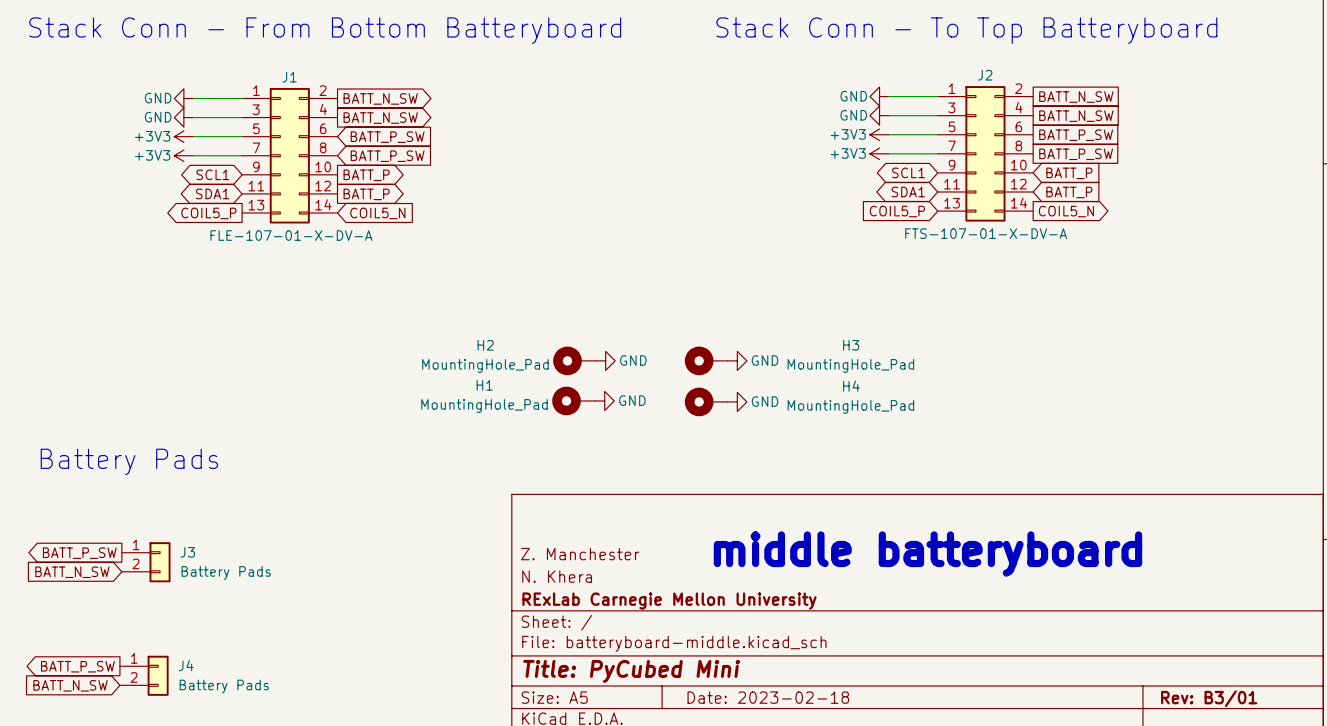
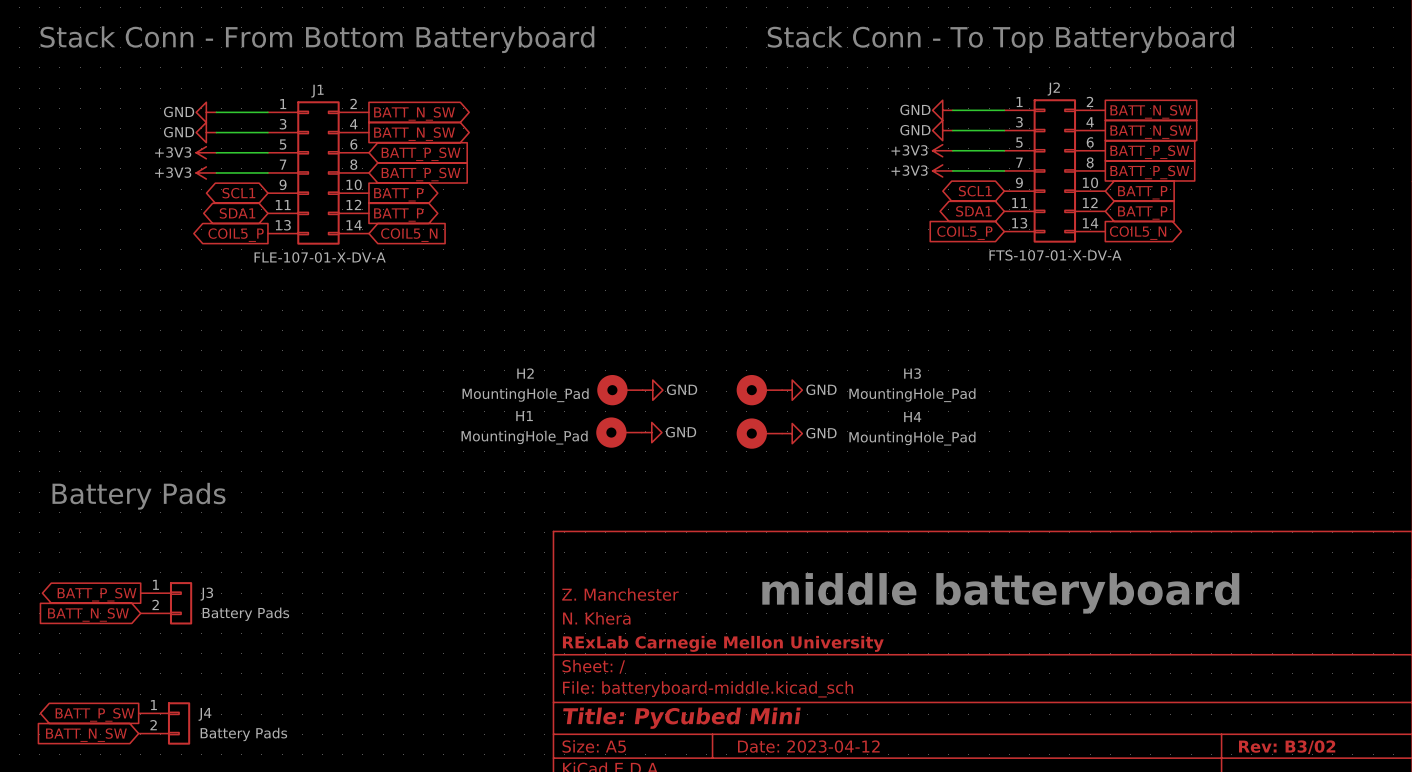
title block: Date: 2023-02-18 (768, 697) -> Date: 2023-04-12 (808, 746)
title block: Rev: B3/01 (1209, 698) -> Rev: B3/02 (1287, 747)

